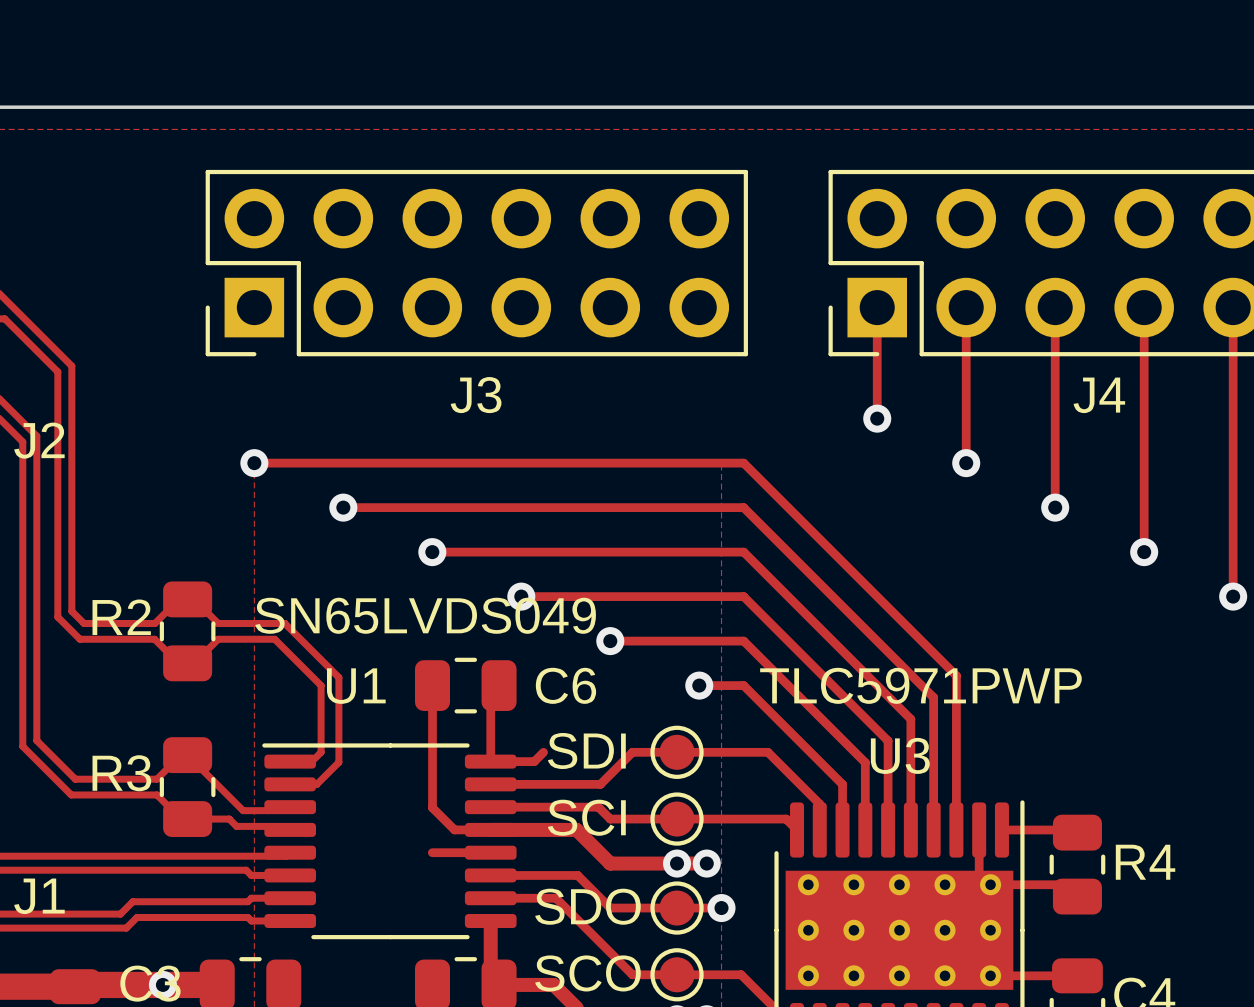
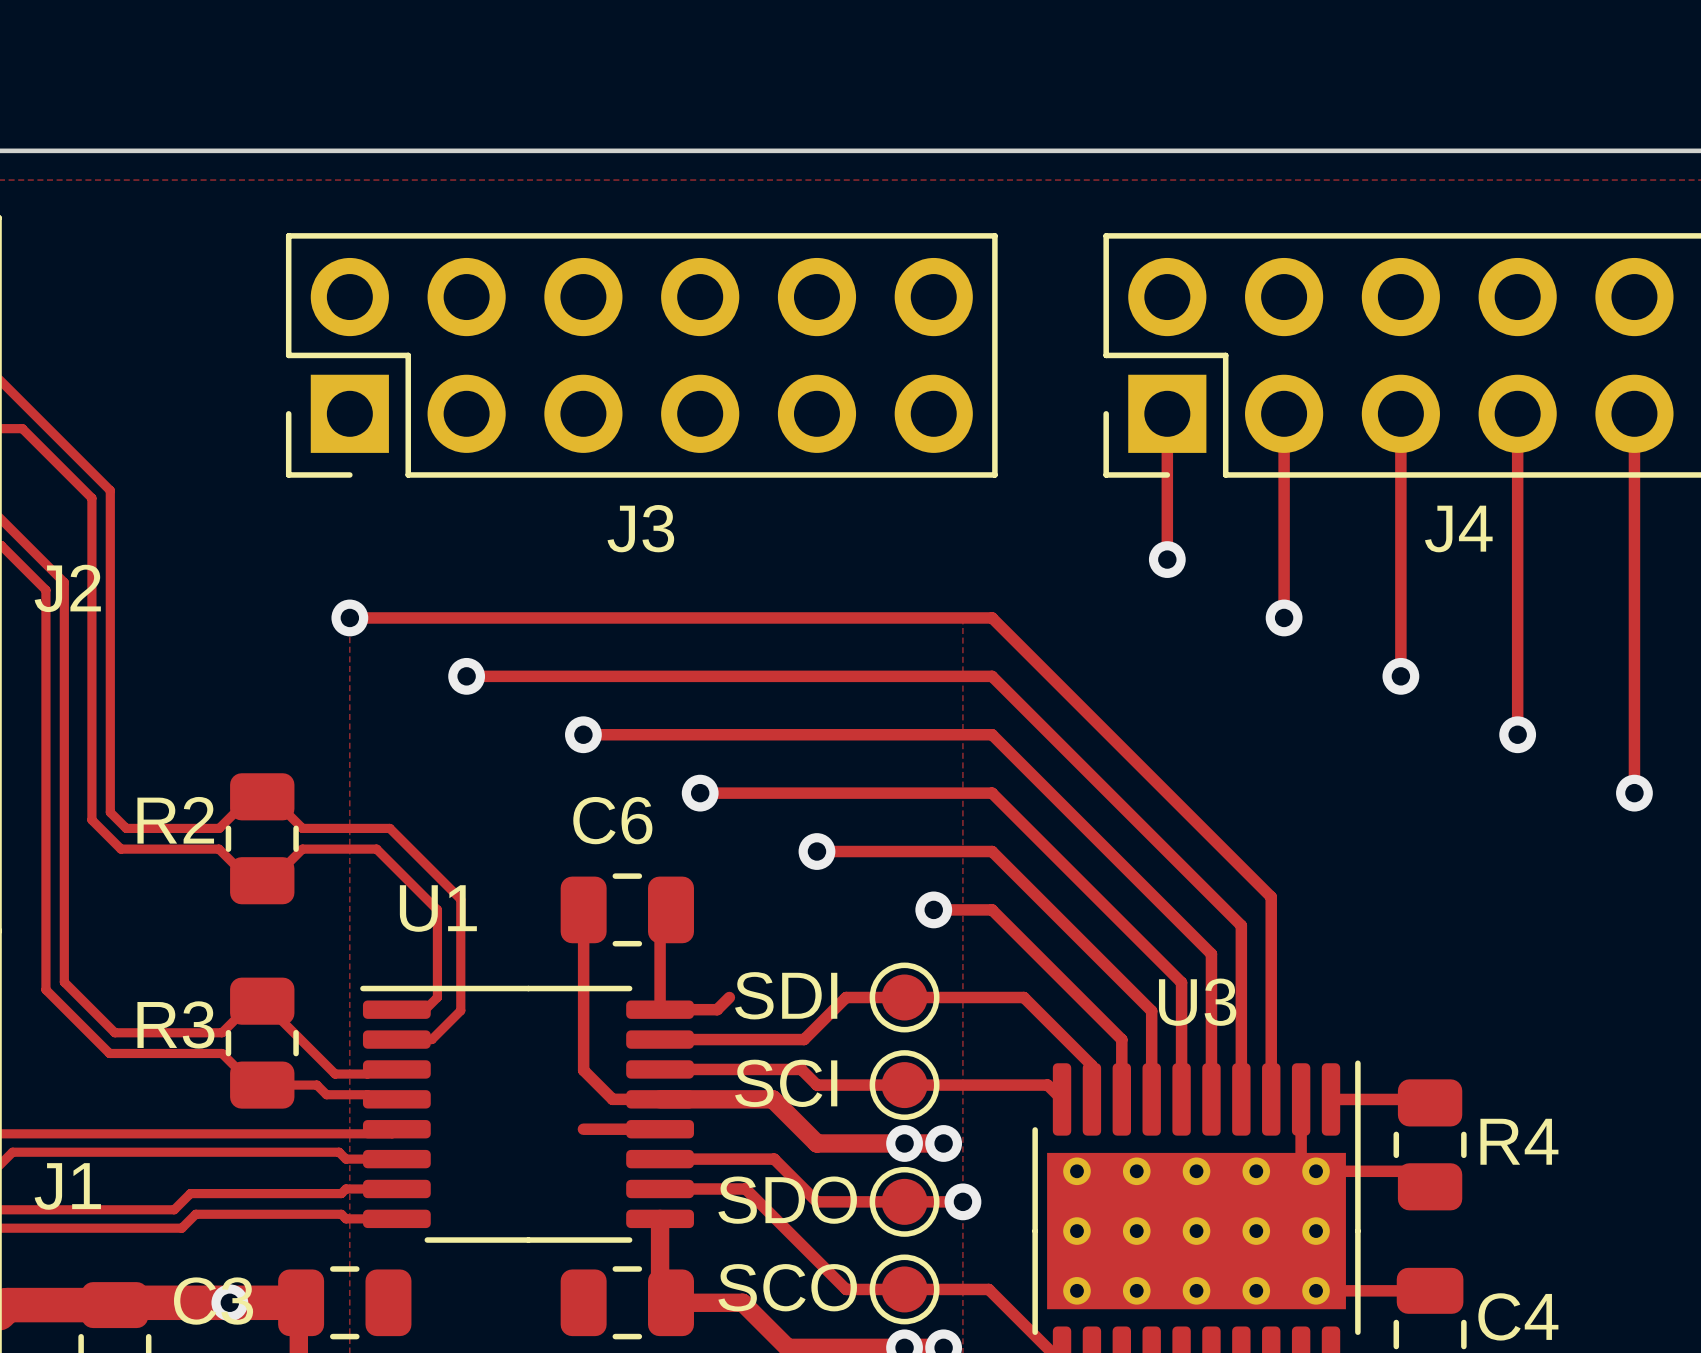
U1 value: SN65LVDS049 (425, 615) -> none
C6 name position: C6 (565, 685) -> C6 (612, 820)
U3 value: TLC5971PWP (920, 685) -> none
U1 name position: U1 (356, 686) -> U1 (438, 908)

